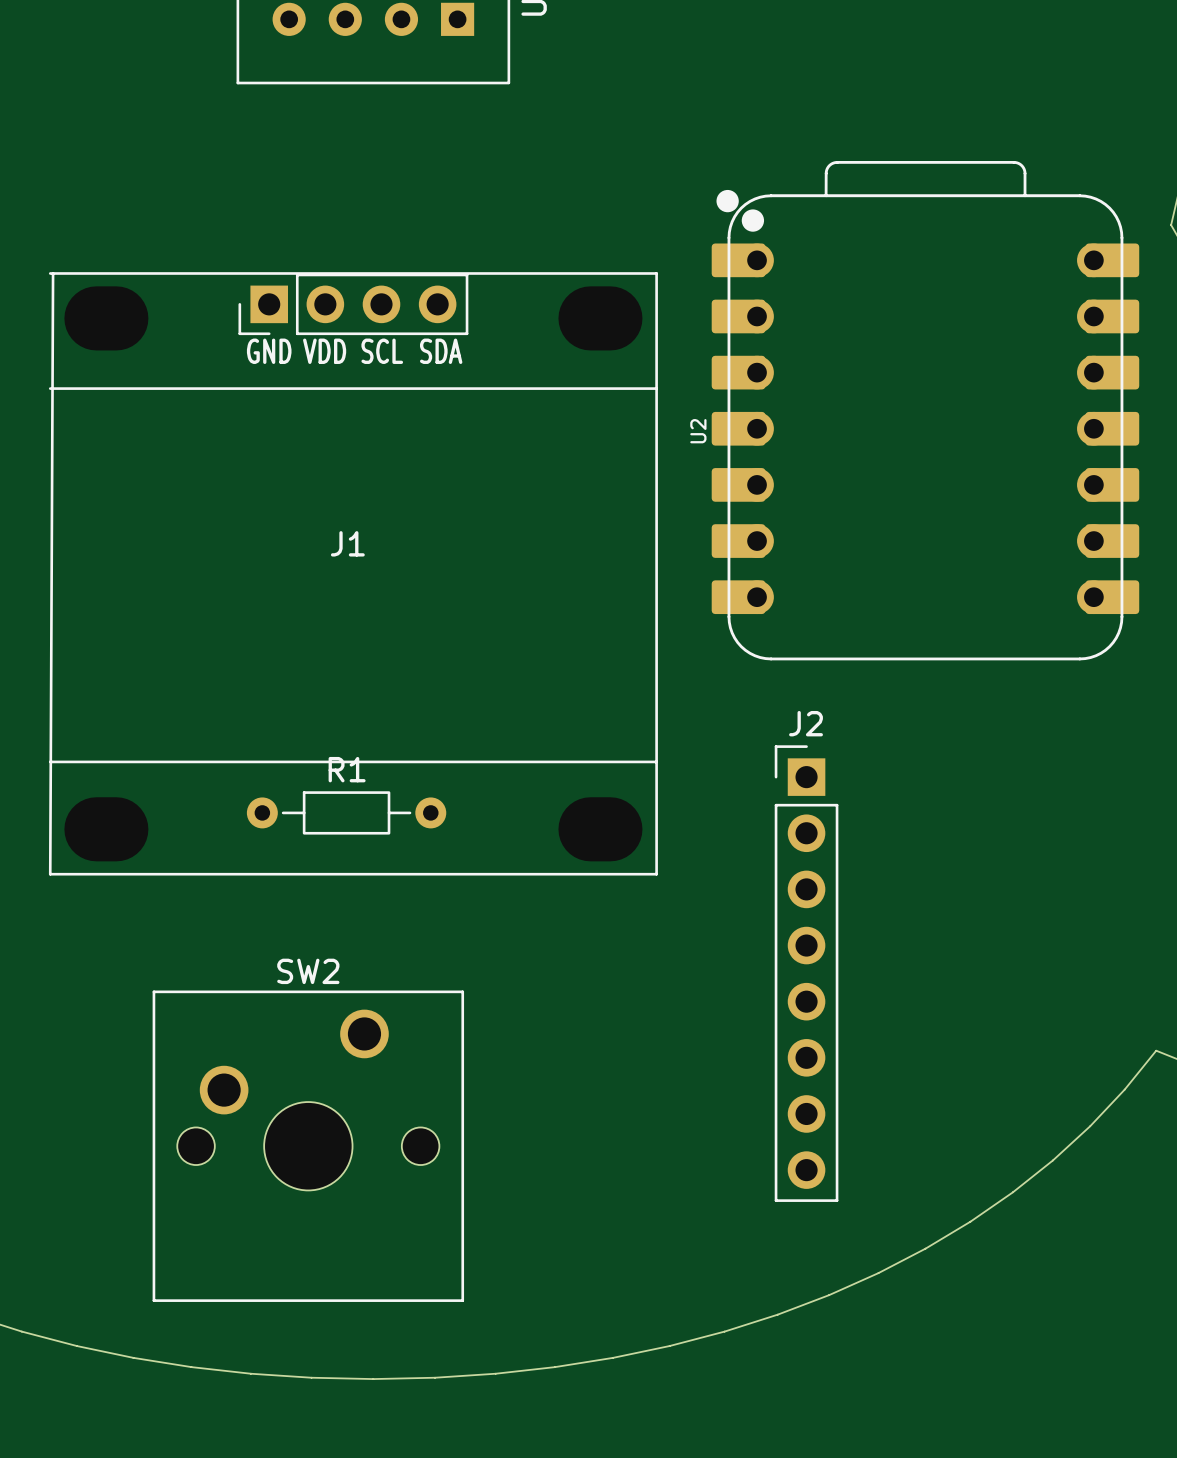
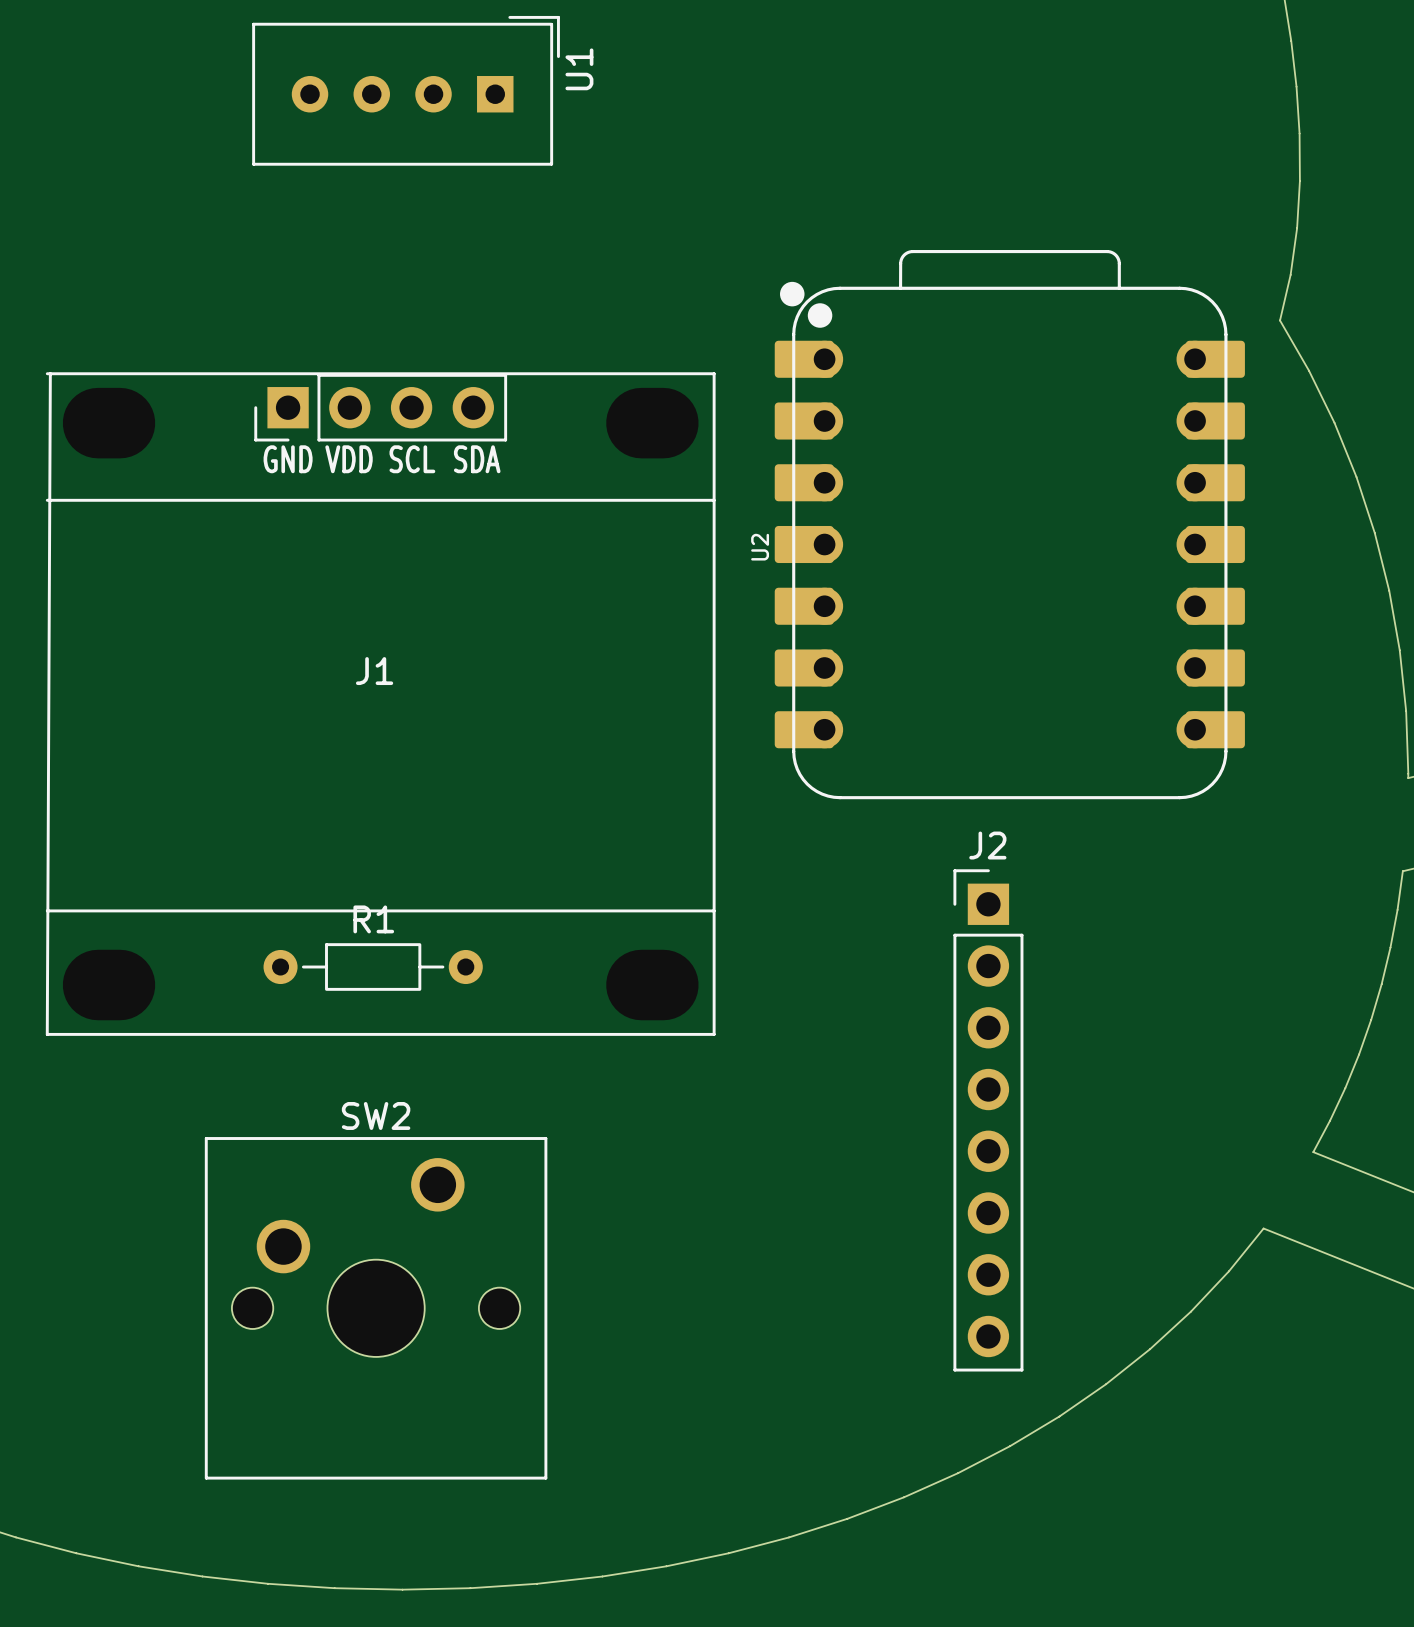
J2 position: (806, 973) -> (988, 1120)
SW2 position: (308, 1146) -> (376, 1308)

